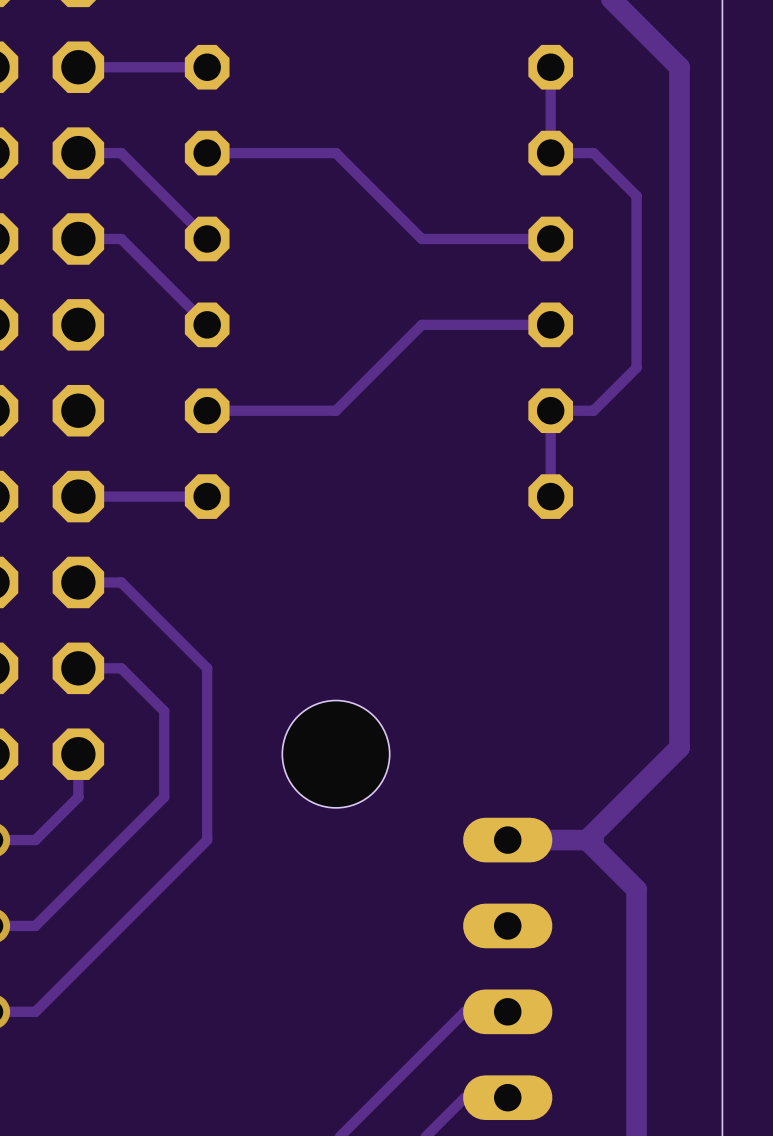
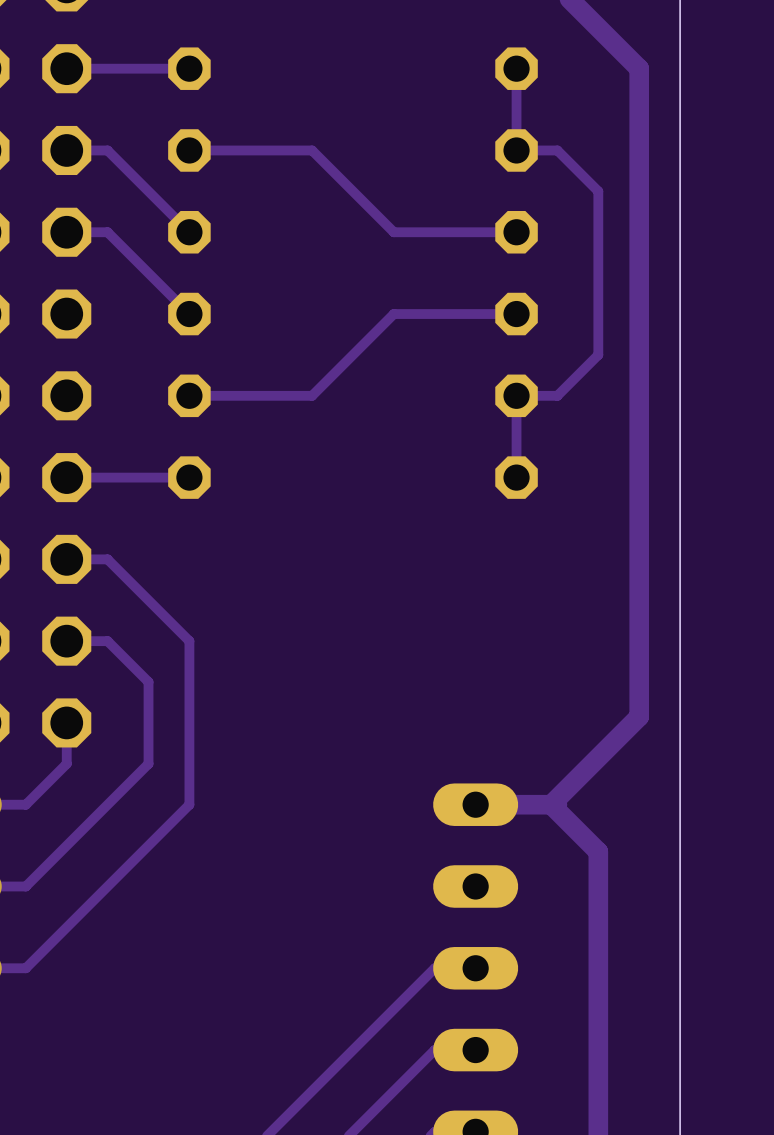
hole: (336, 754) -> none

